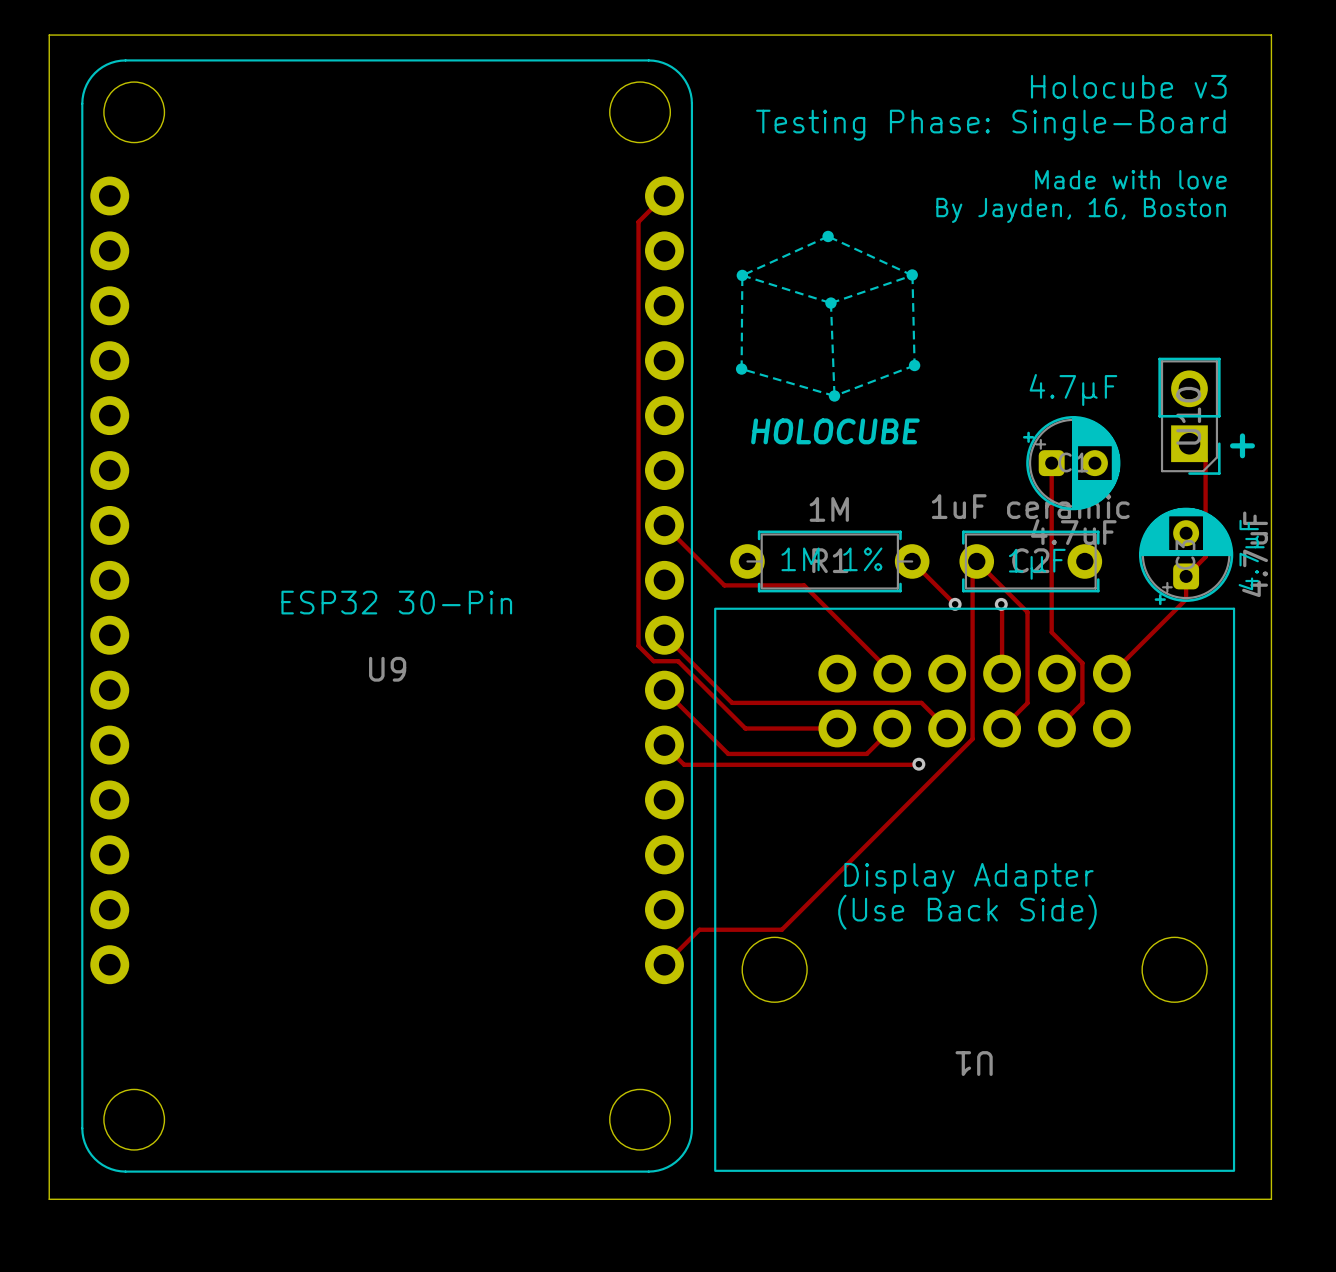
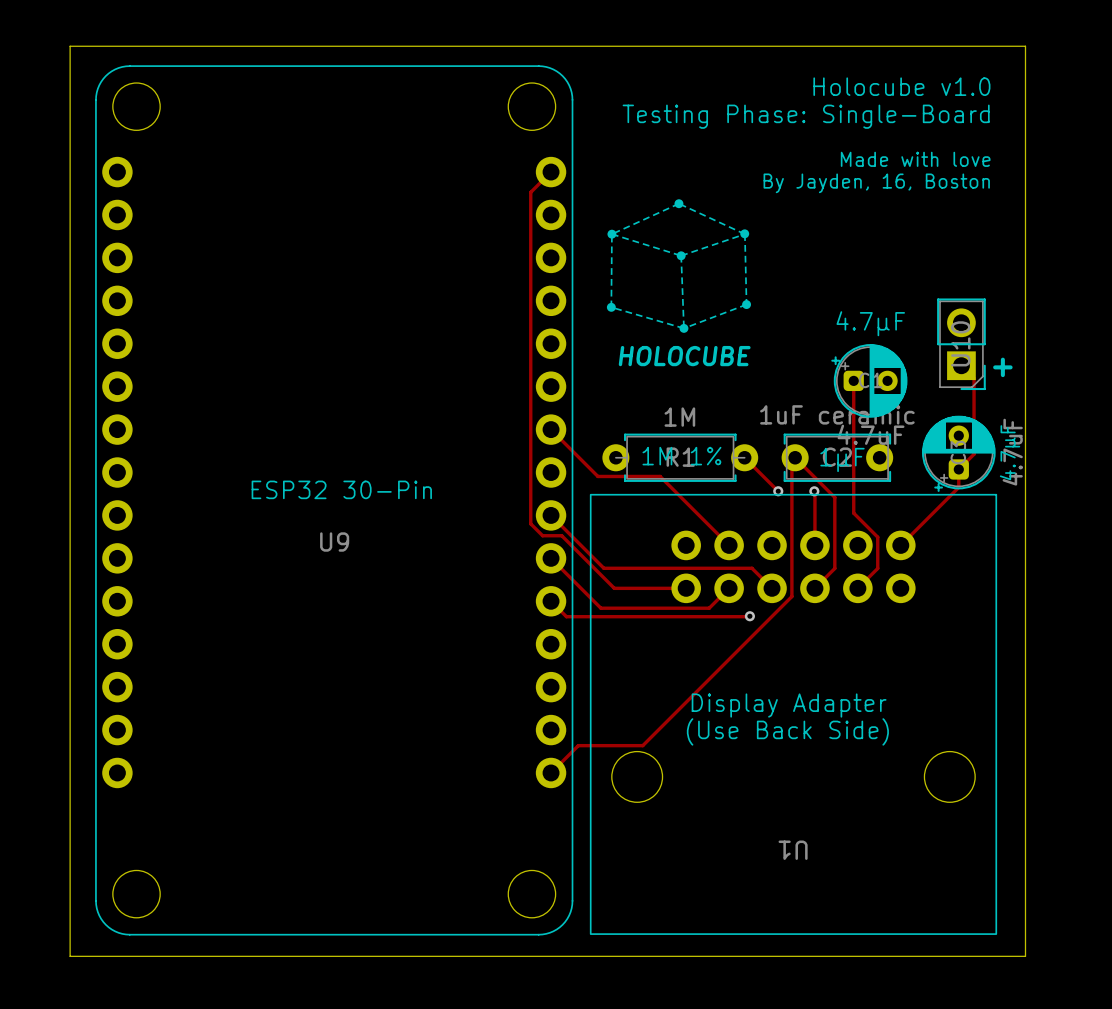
text: Holocube v3 (1128, 86) -> Holocube v1.0 (901, 86)

